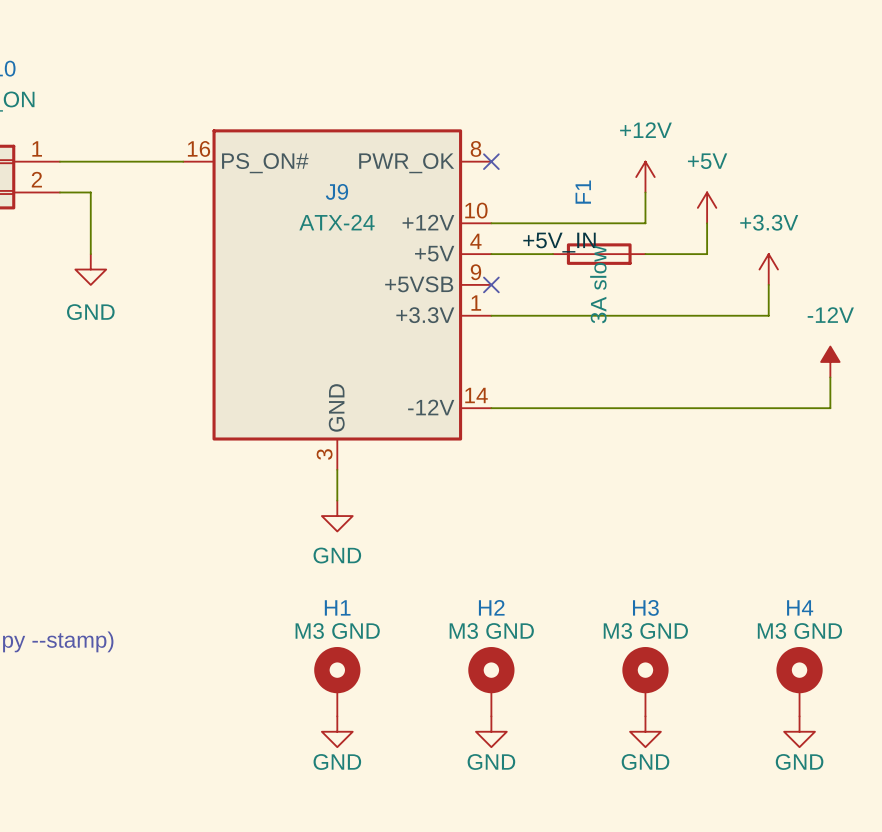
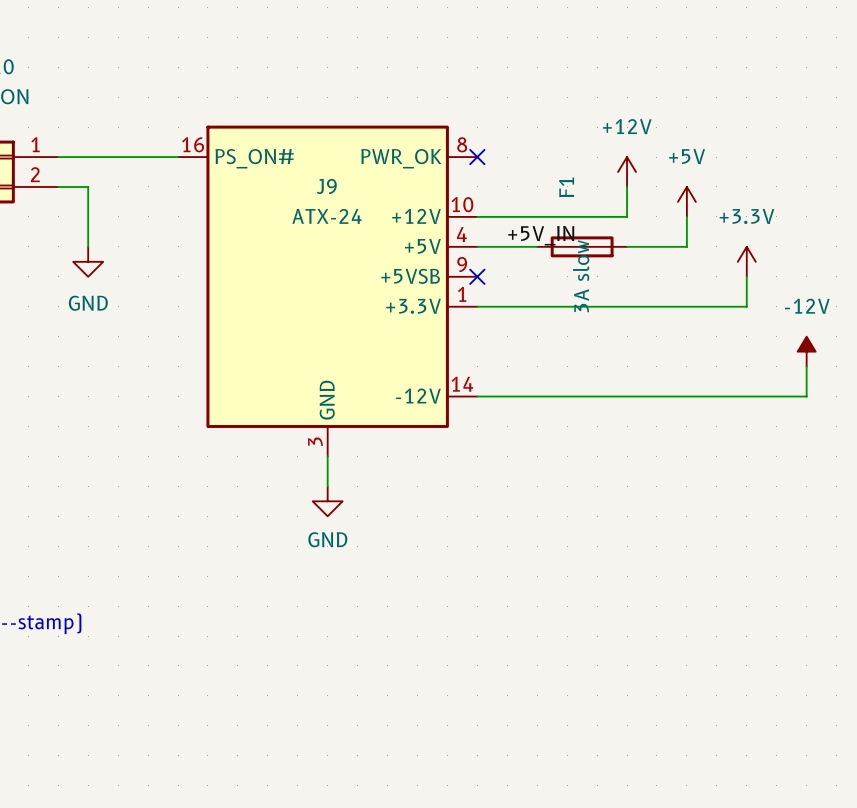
H1: M3 GND (337, 681) -> none
H2: M3 GND (491, 681) -> none
H3: M3 GND (645, 681) -> none
H4: M3 GND (799, 681) -> none
power symbol: GND (337, 731) -> none
power symbol: GND (491, 731) -> none
power symbol: GND (645, 731) -> none
power symbol: GND (799, 731) -> none

